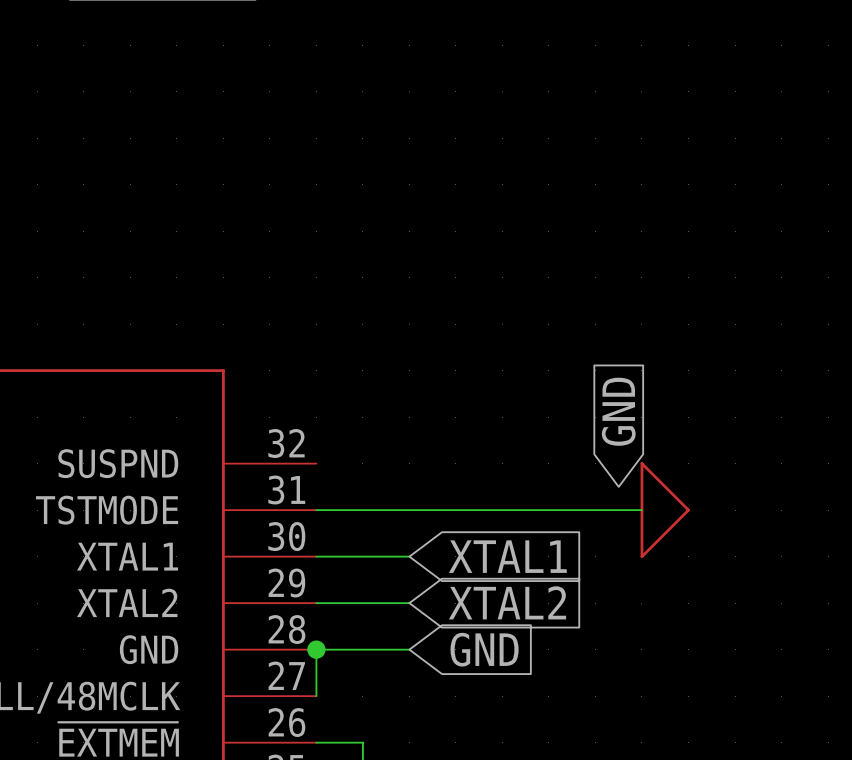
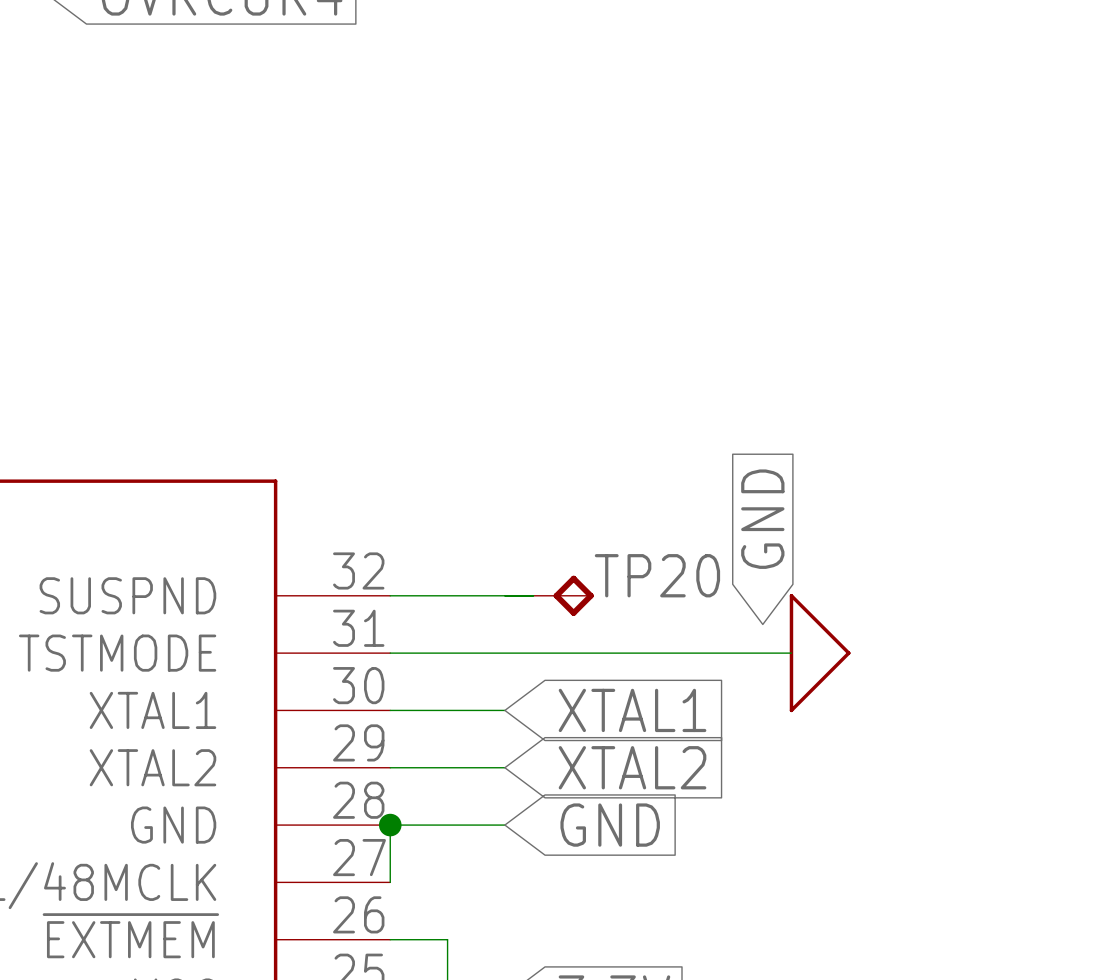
wire: none -> (390, 595) (533, 595)
TP20: none -> (563, 595)

